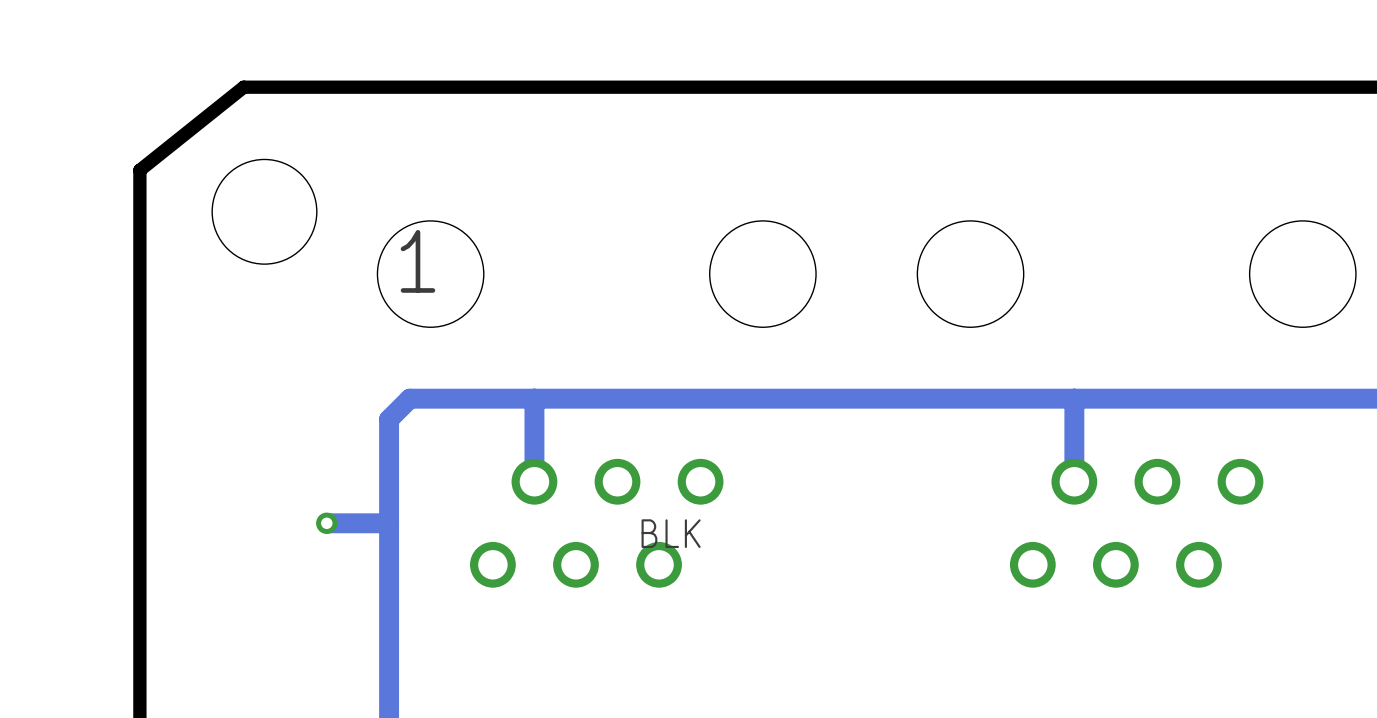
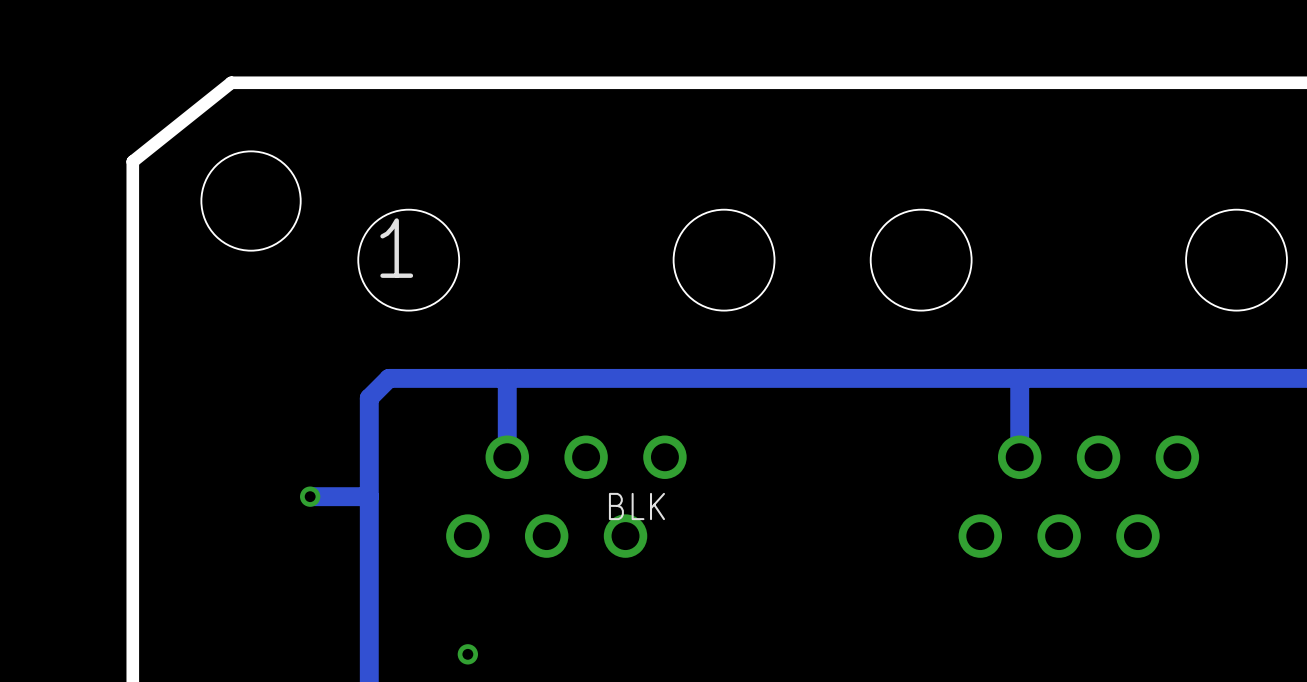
via: none -> (467, 654)

